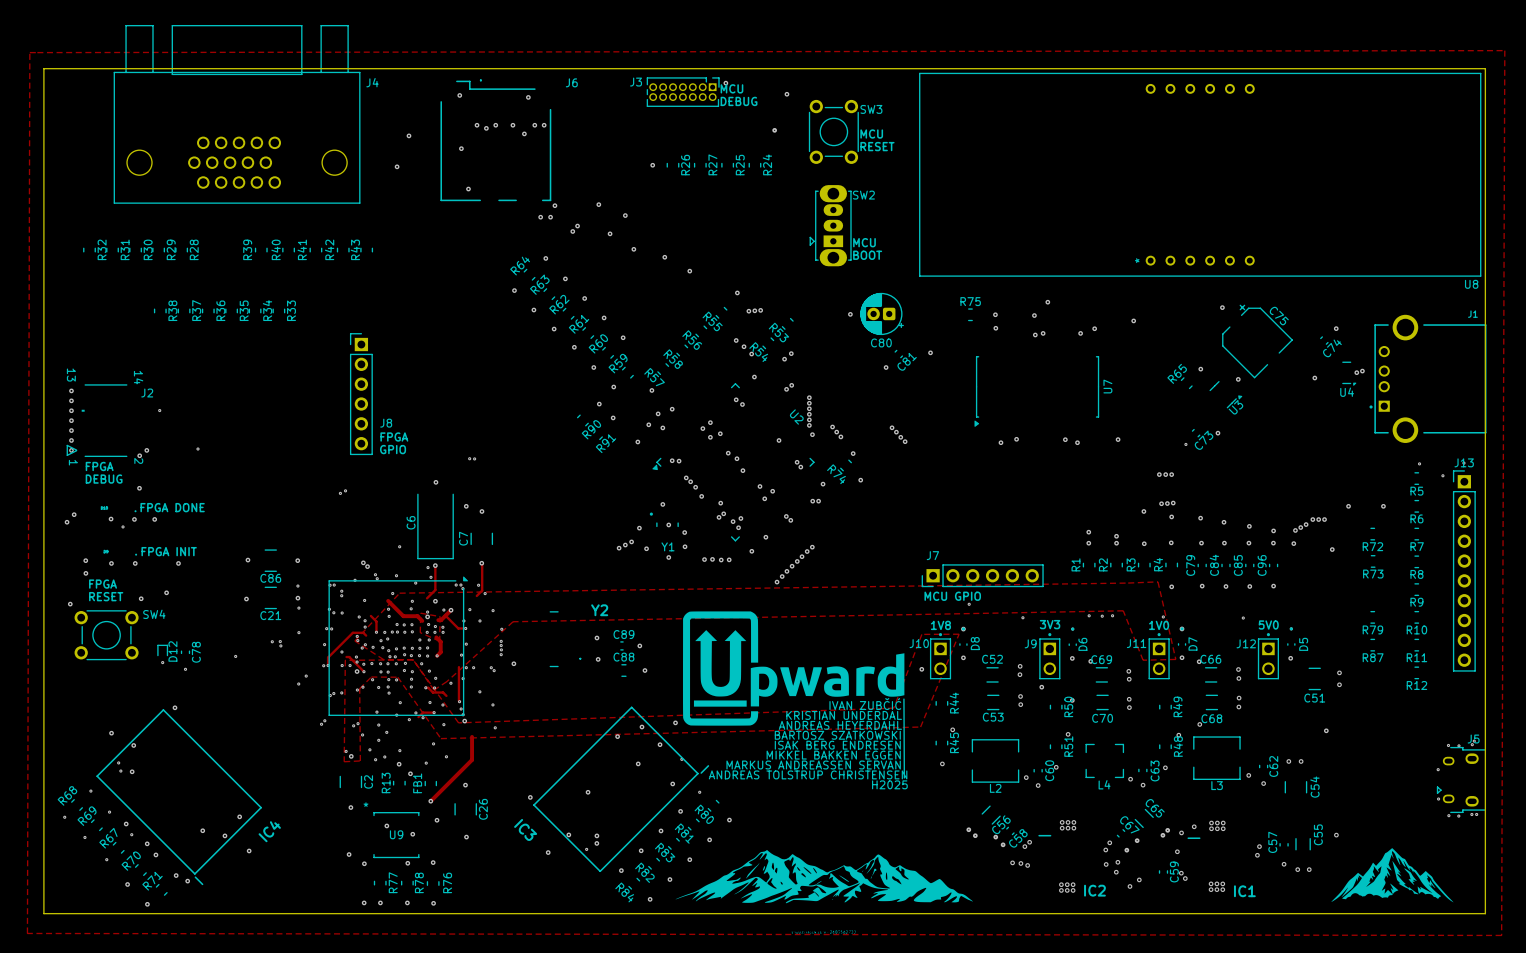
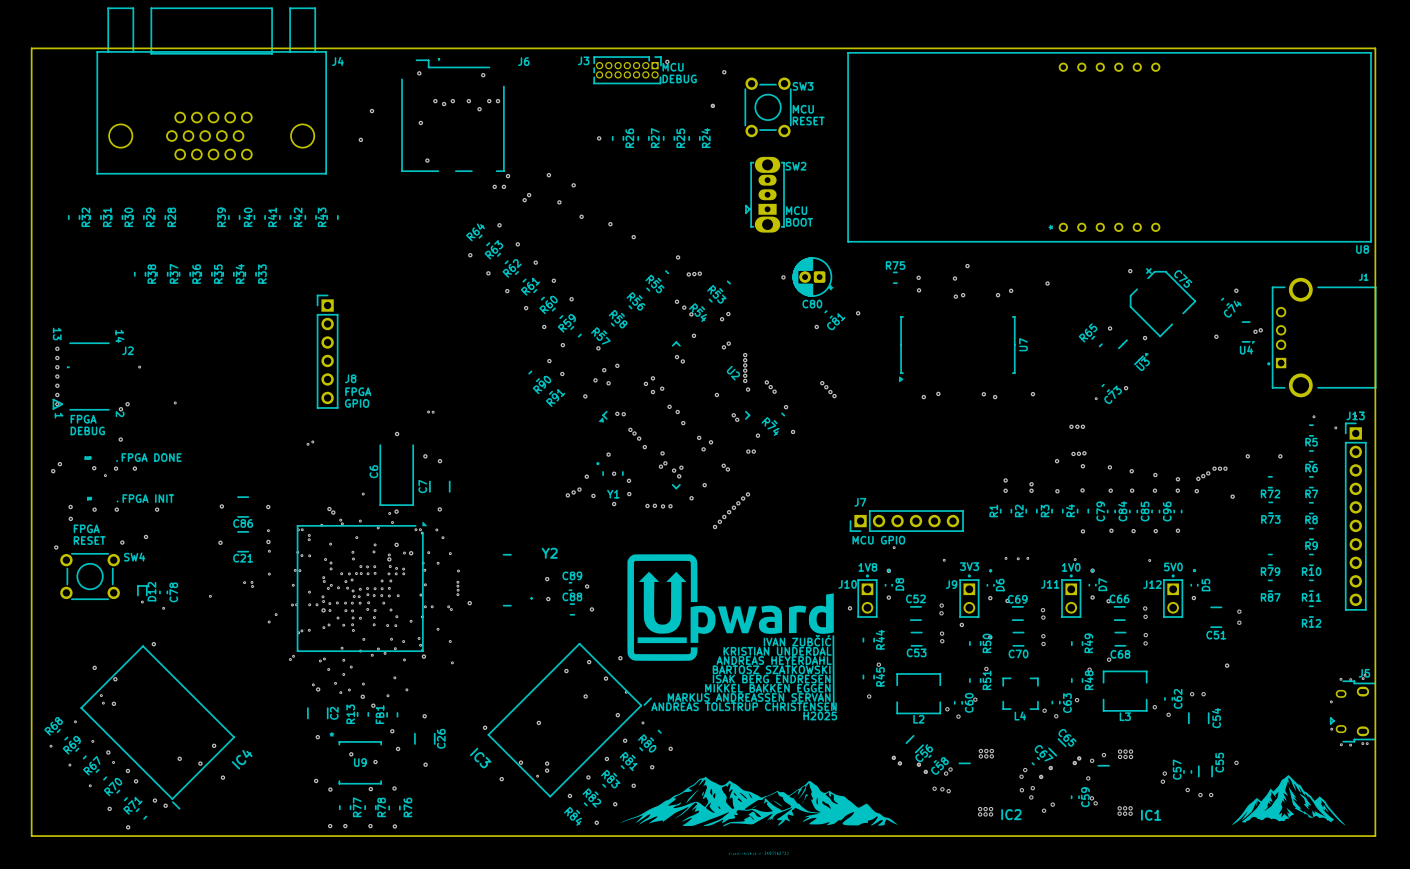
zone outline: (1504, 50) (29, 52) (27, 933) (1501, 935) (1504, 50) -> none
track: (482, 563) (482, 590) (476, 595) -> none
track: (435, 565) (435, 590) (427, 598) -> none
track: (388, 600) (403, 616) (417, 616) (422, 620) -> none
track: (451, 610) (441, 620) (438, 620) -> none
zone outline: (420, 613) (420, 632) (439, 641) (440, 616) (420, 613) -> none
track: (370, 615) (376, 621) (376, 632) -> none
track: (445, 615) (458, 628) (465, 628) -> none
track: (366, 635) (363, 632) (352, 632) (328, 657) (328, 665) -> none
track: (436, 637) (440, 641) (440, 652) (437, 655) -> none
track: (346, 657) (349, 657) (363, 671) -> none
zone outline: (413, 659) (433, 690) (446, 681) (513, 621) (1123, 610) (1143, 660) (1175, 659) (1157, 581) (399, 593) (354, 640) (383, 659) (413, 659) -> none
zone outline: (413, 659) (458, 722) (893, 708) (921, 634) (959, 634) (920, 727) (440, 738) (397, 677) (371, 677) (359, 688) (360, 760) (344, 761) (345, 660) (413, 659) -> none
track: (458, 667) (459, 701) -> none
track: (425, 687) (432, 692) (443, 692) (446, 695) -> none
track: (434, 712) (422, 712) (418, 717) -> none
track: (472, 736) (472, 759) (430, 801) -> none

